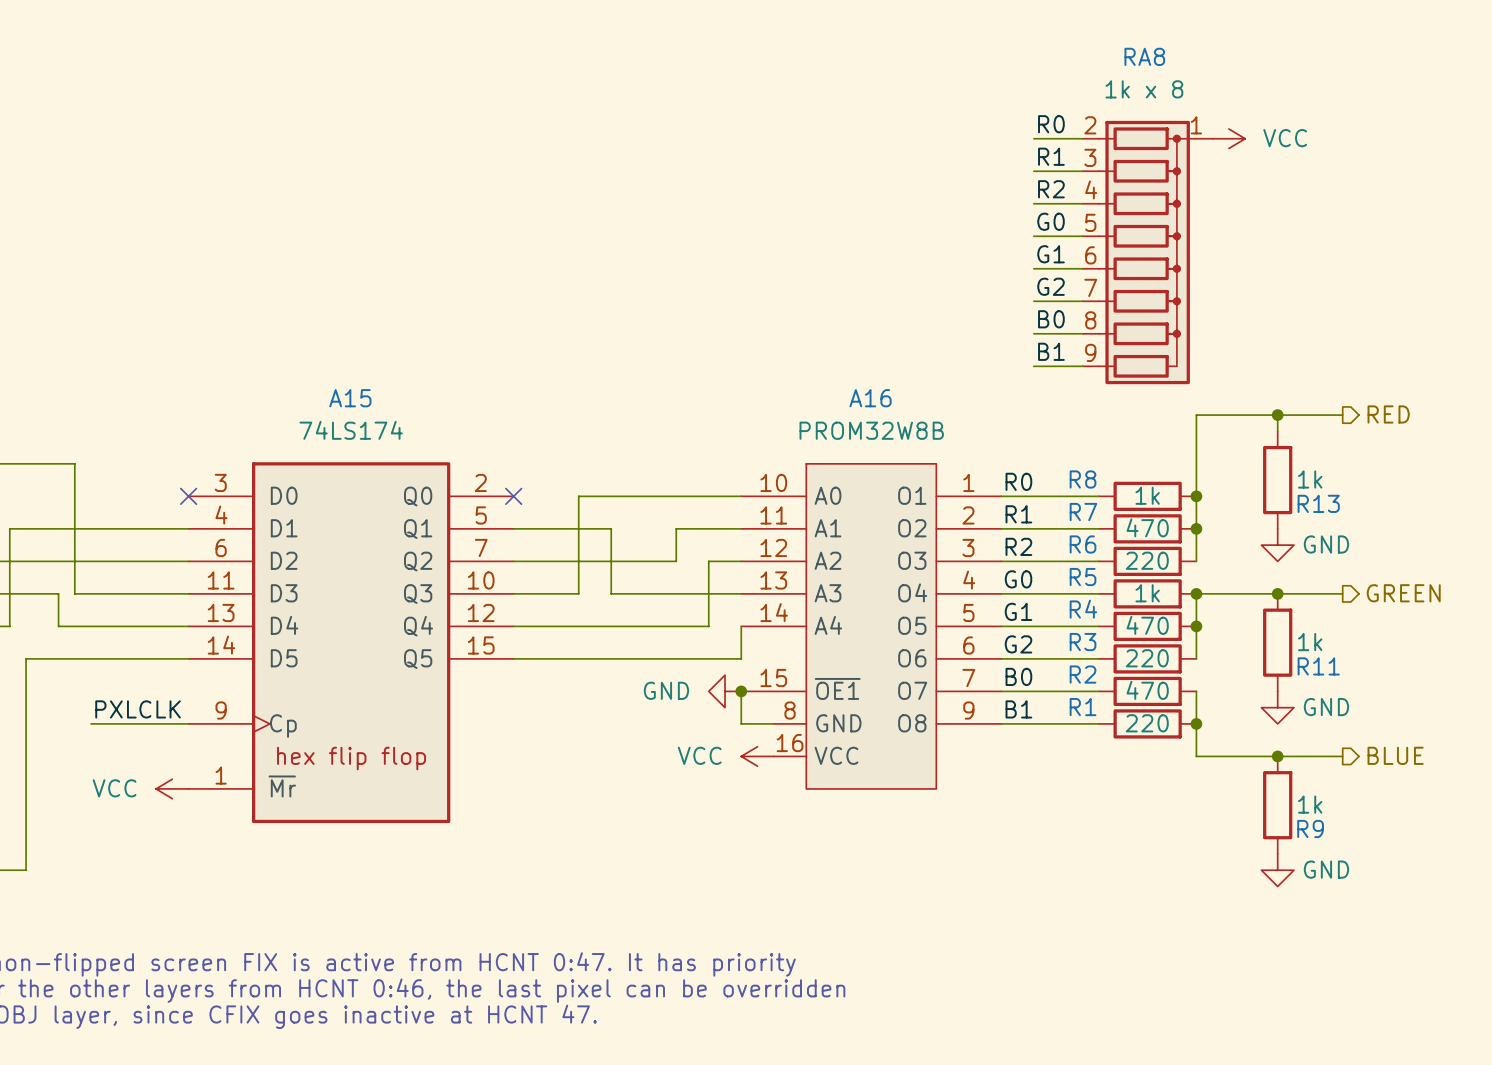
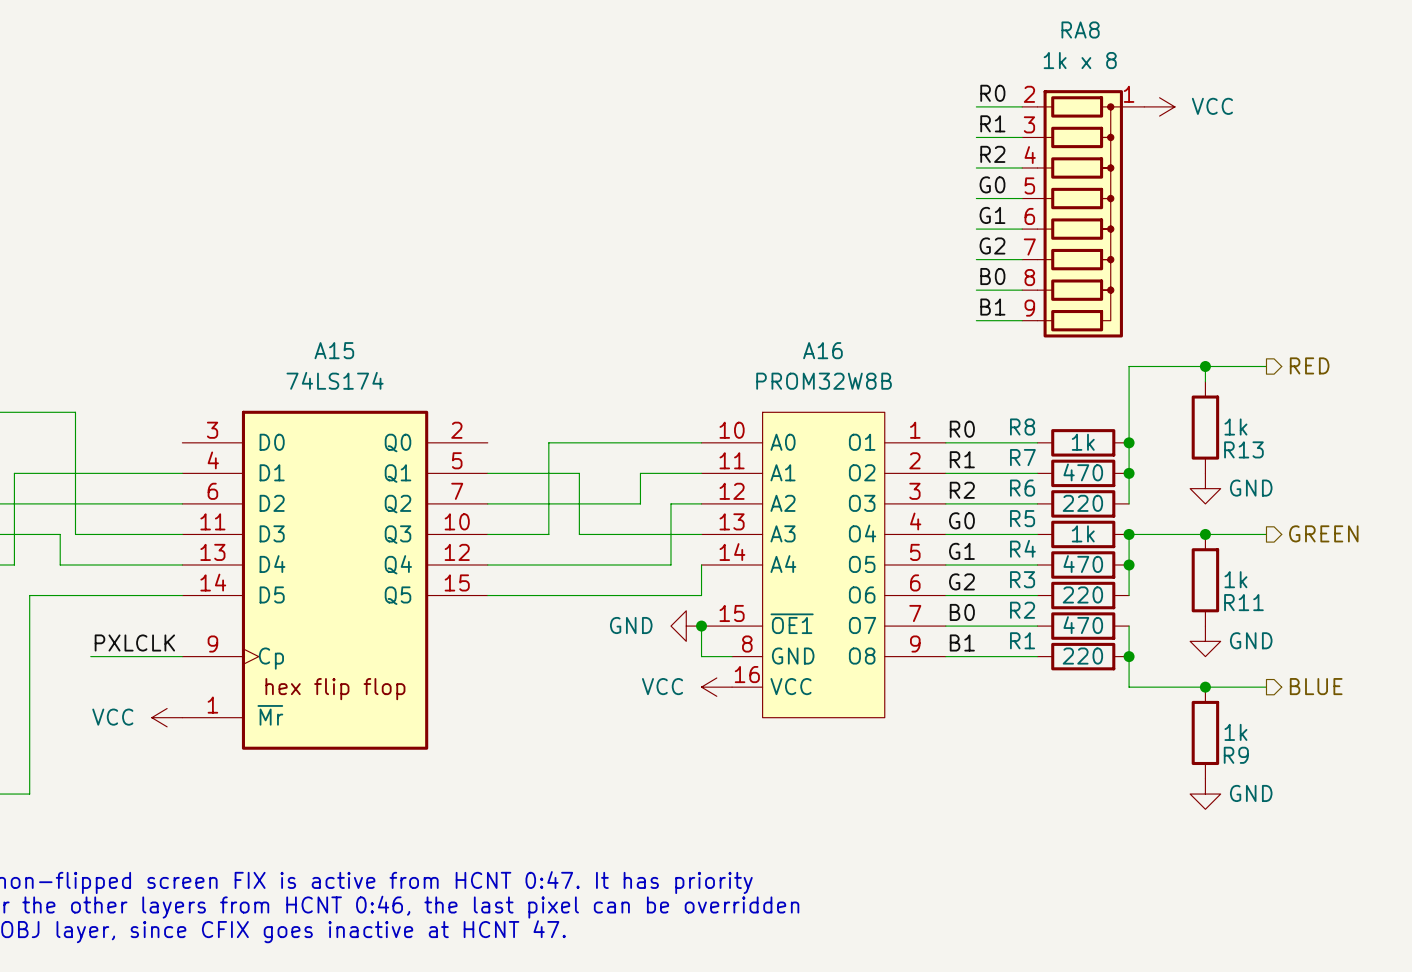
no-connect mark: (188, 496) -> none
no-connect mark: (513, 496) -> none

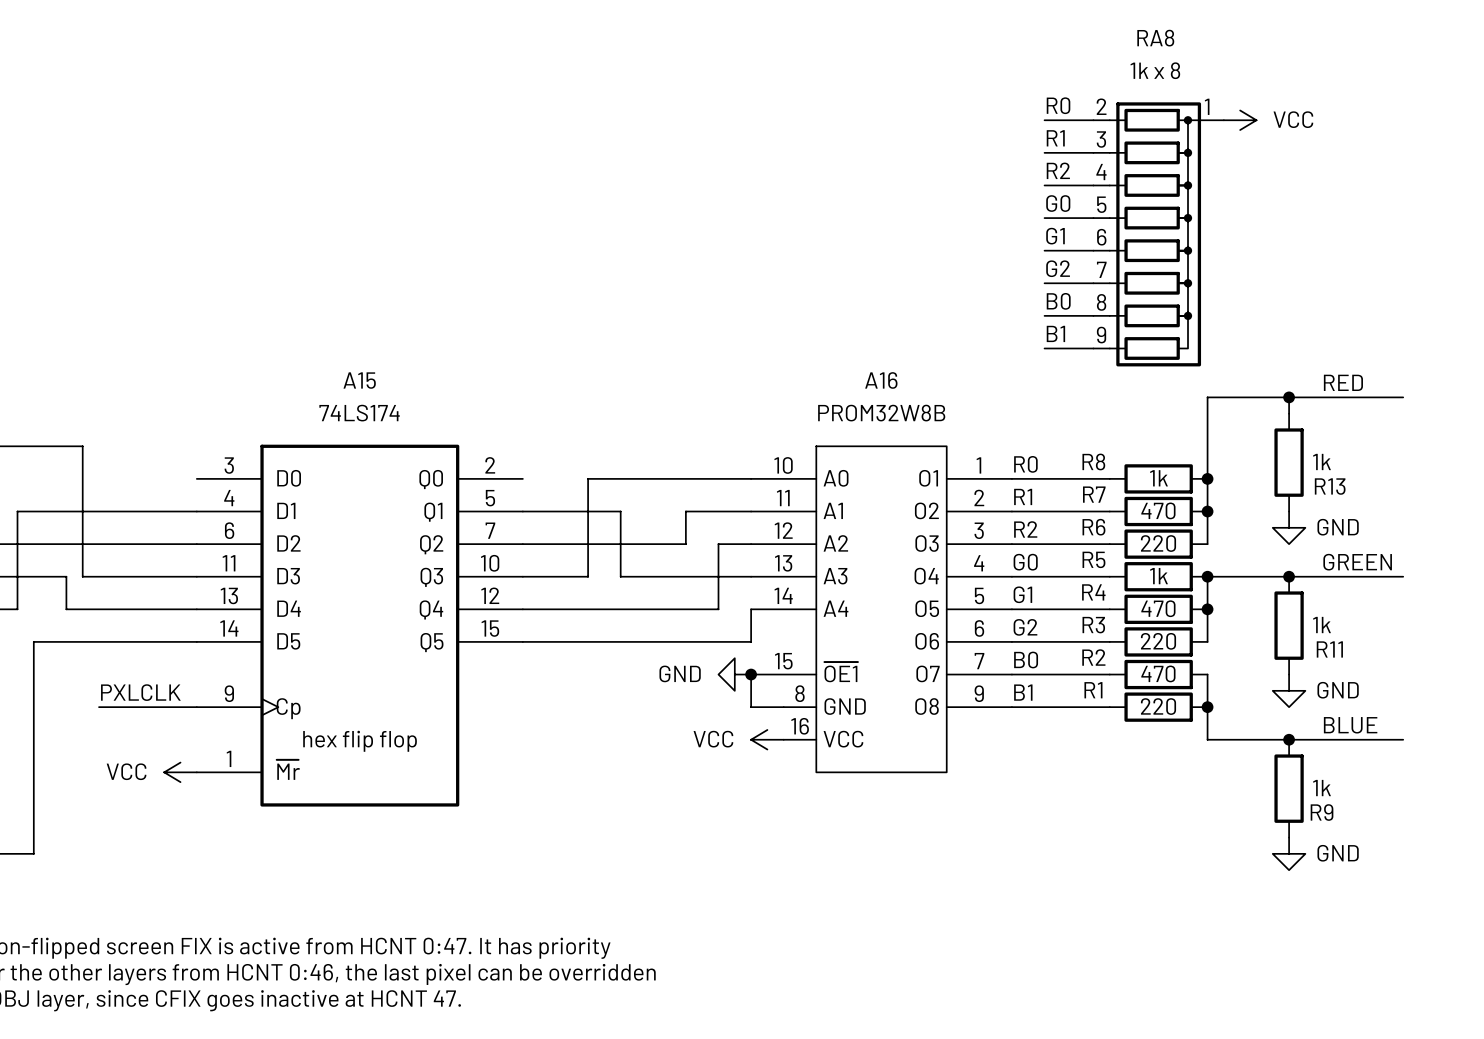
label: none -> RED (1343, 382)
hierarchical label: RED (1309, 365) -> none
wire: none -> (1354, 397) (1403, 397)
label: none -> GREEN (1357, 562)
hierarchical label: GREEN (1323, 533) -> none
wire: none -> (1354, 576) (1403, 576)
label: none -> BLUE (1350, 725)
hierarchical label: BLUE (1316, 686) -> none
wire: none -> (1354, 739) (1403, 739)

